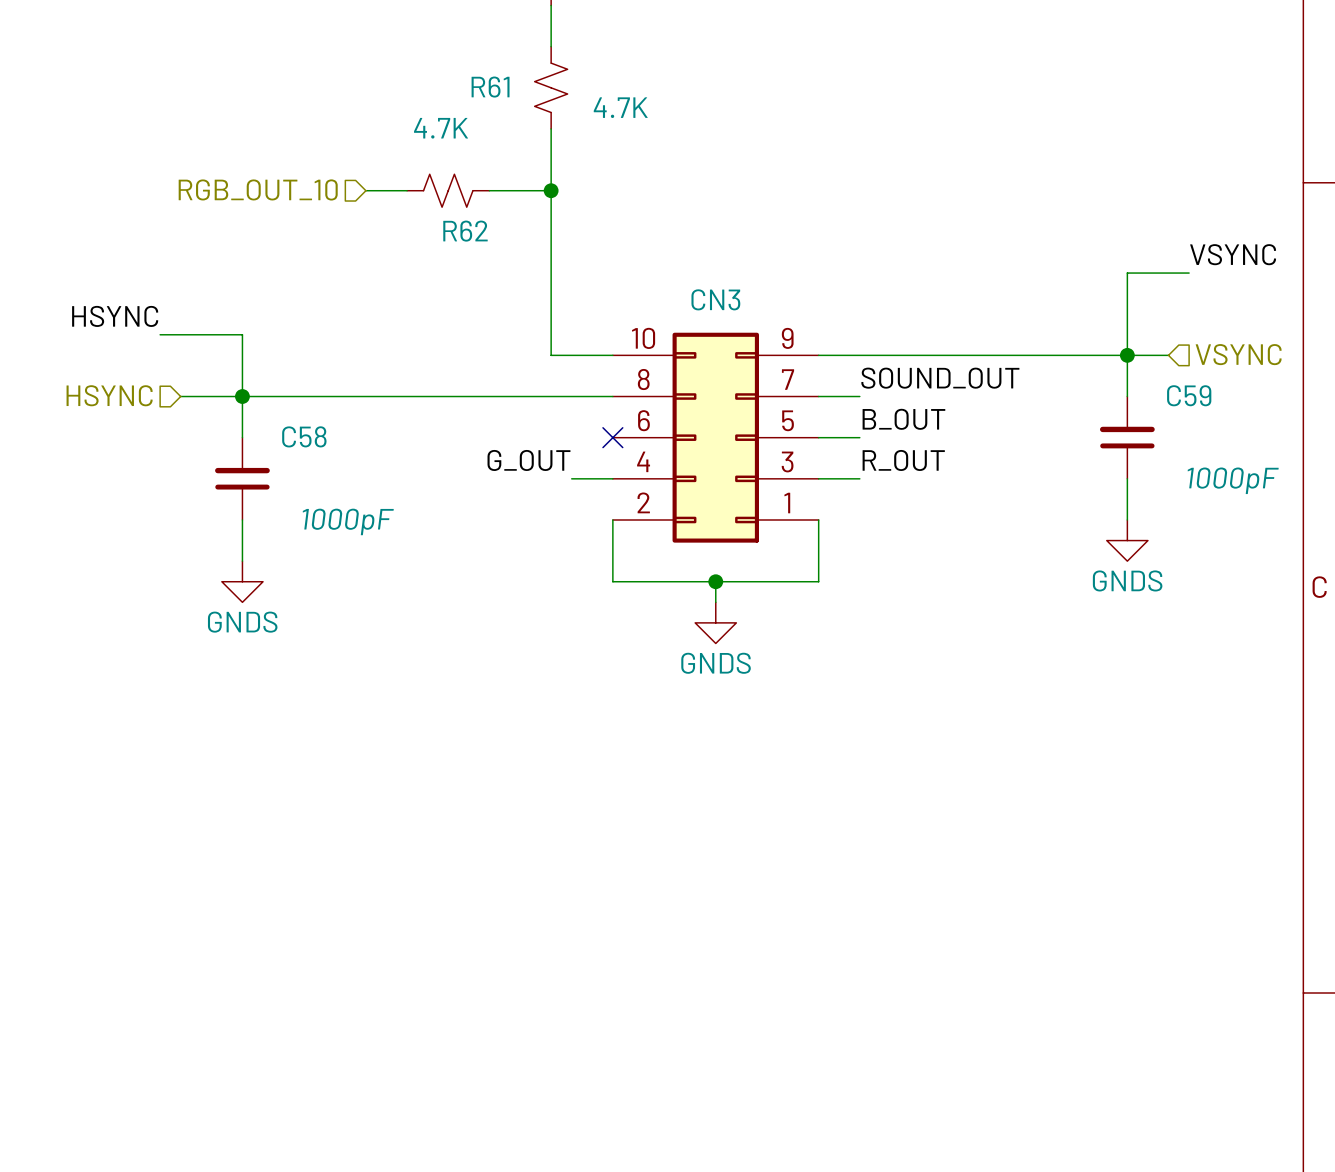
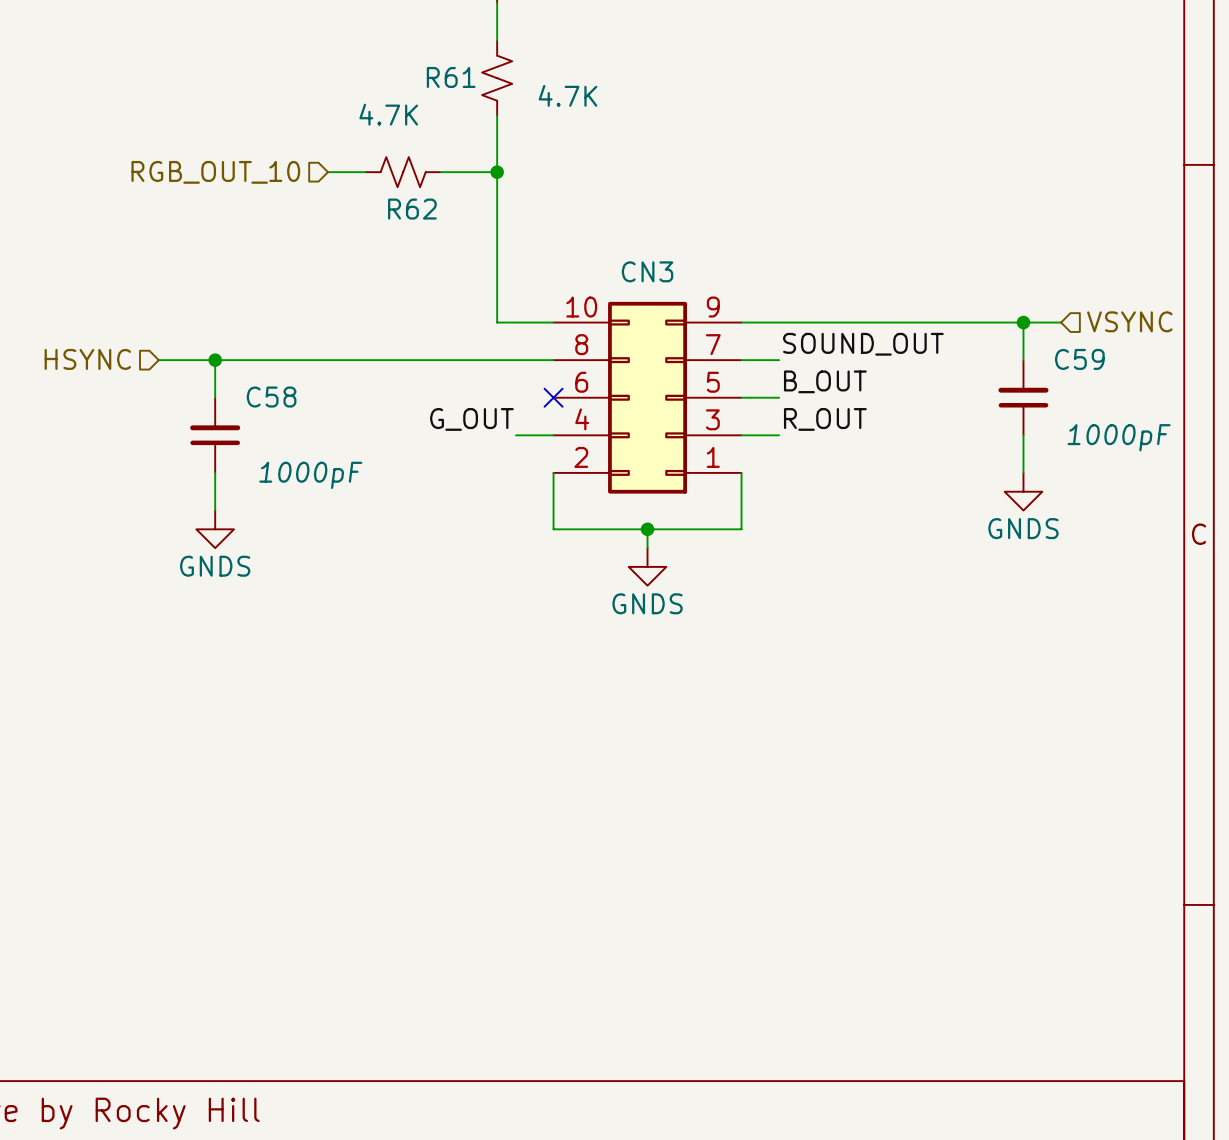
label: VSYNC (1233, 254) -> none
wire: (1189, 273) (1127, 273) (1127, 355) -> none
label: HSYNC (115, 316) -> none
wire: (160, 334) (242, 334) (242, 396) -> none

